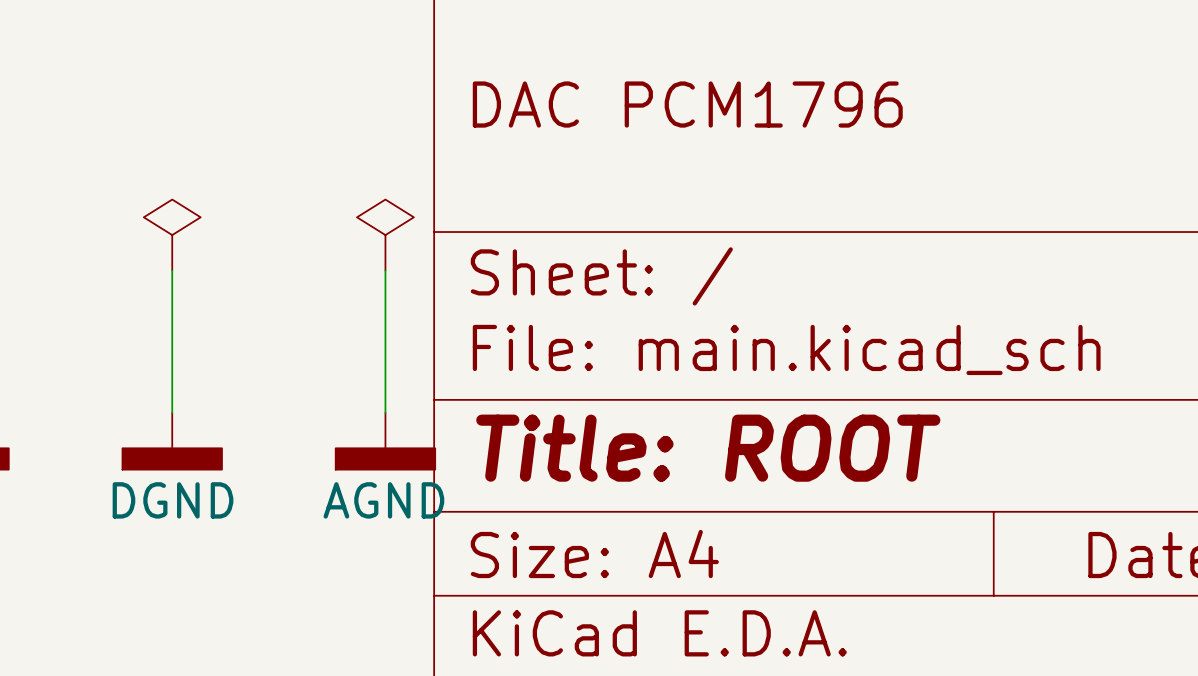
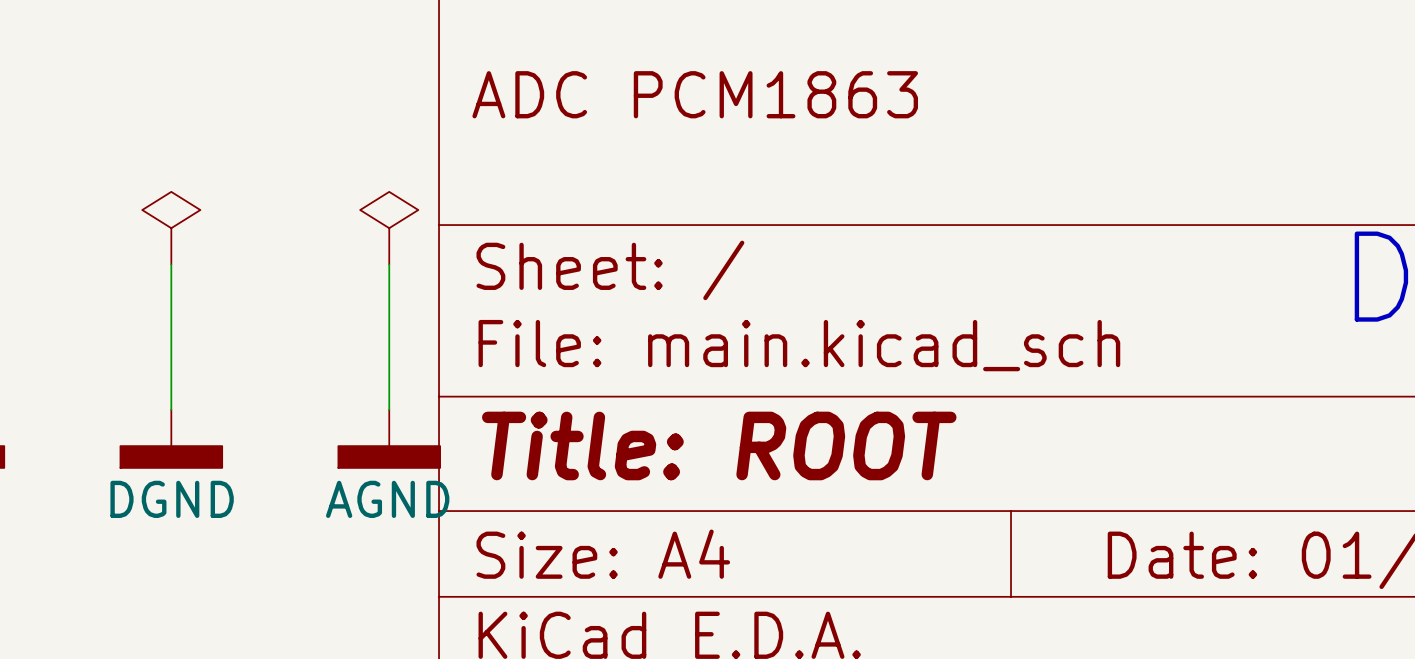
title block: DAC PCM1796 (687, 104) -> ADC PCM1863 (695, 94)

